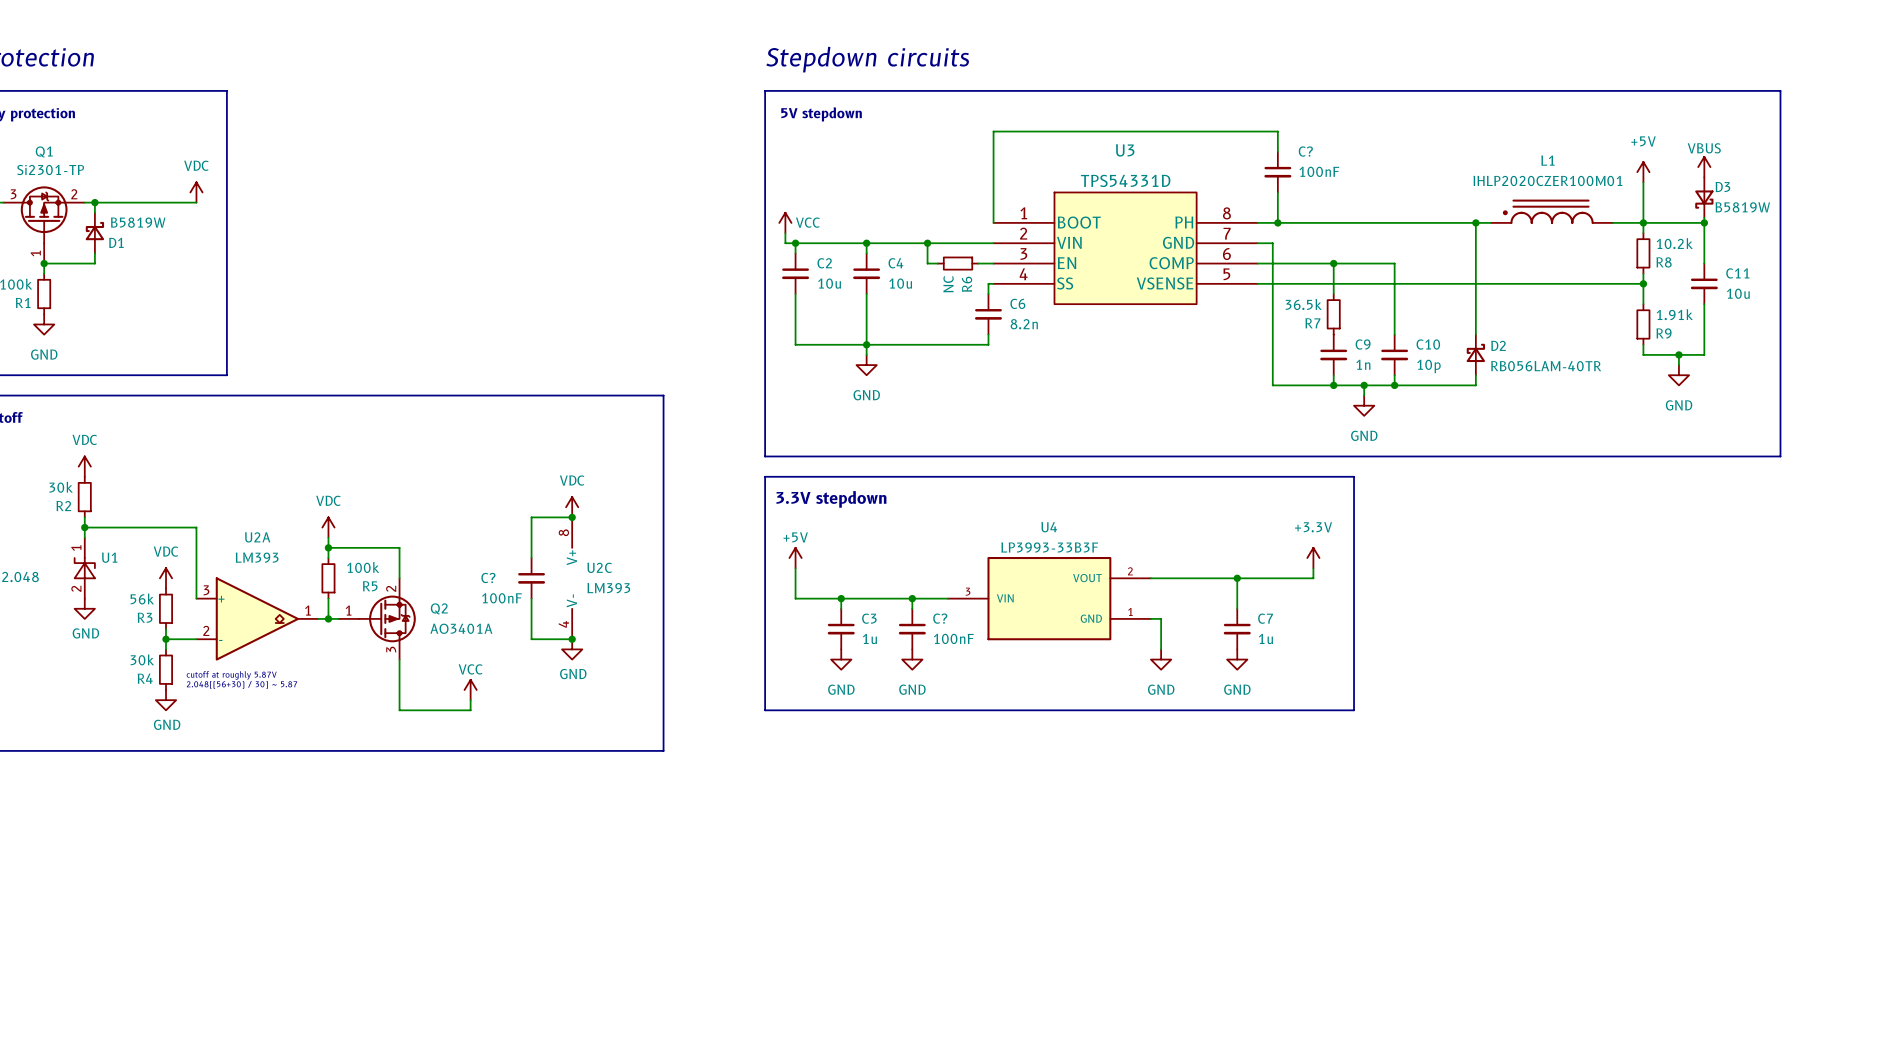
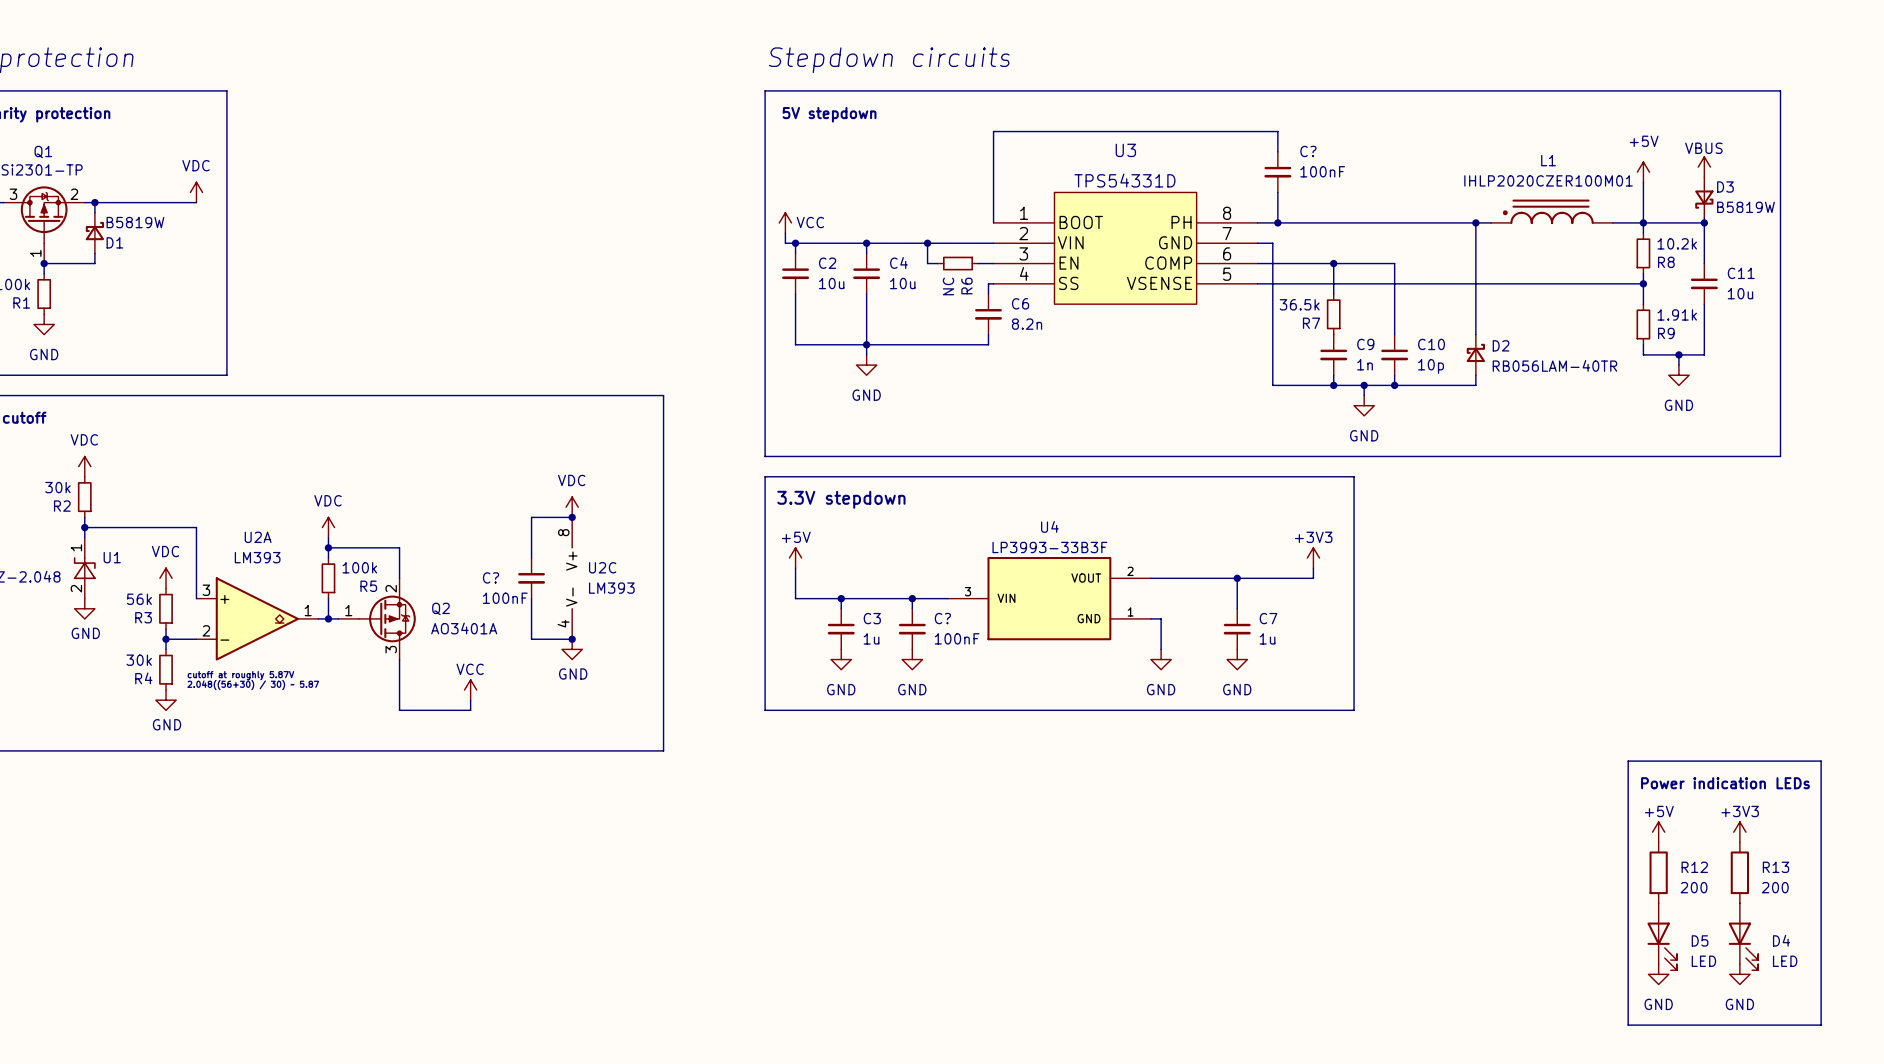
power symbol: +3.3V (1313, 558) -> +3V3 (1313, 558)
line: none -> (1628, 761) (1821, 761) (1821, 1025) (1628, 1025) (1628, 761)
text: none -> Power indication LEDs (1725, 783)
power symbol: none -> +5V (1658, 832)
power symbol: none -> +3V3 (1739, 832)
R12: none -> 200 (1658, 872)
R13: none -> 200 (1739, 872)
D5: none -> LED (1662, 936)
D4: none -> LED (1743, 936)
power symbol: none -> GND (1658, 974)
power symbol: none -> GND (1739, 974)

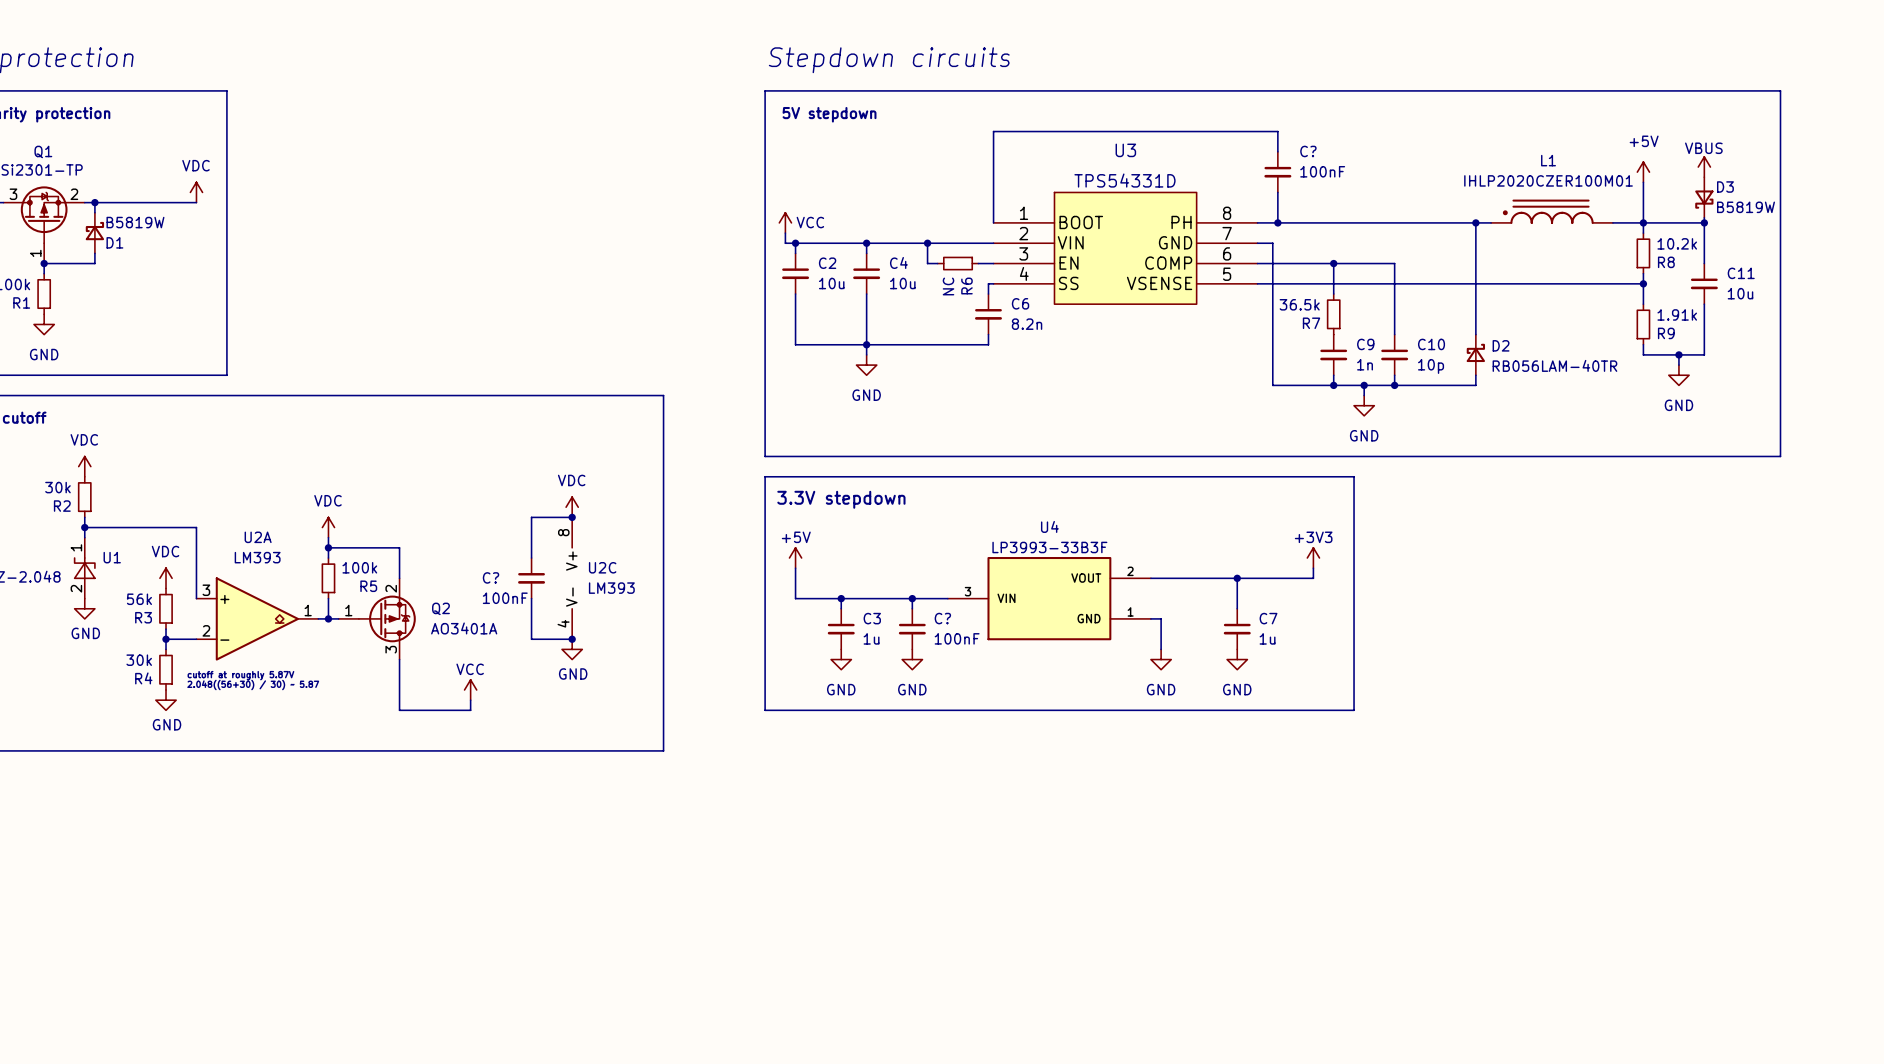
line: (1628, 761) (1821, 761) (1821, 1025) (1628, 1025) (1628, 761) -> none
text: Power indication LEDs (1725, 783) -> none
power symbol: +5V (1658, 832) -> none
power symbol: +3V3 (1739, 832) -> none
R12: 200 (1658, 872) -> none
R13: 200 (1739, 872) -> none
D5: LED (1662, 936) -> none
D4: LED (1743, 936) -> none
power symbol: GND (1658, 974) -> none
power symbol: GND (1739, 974) -> none

